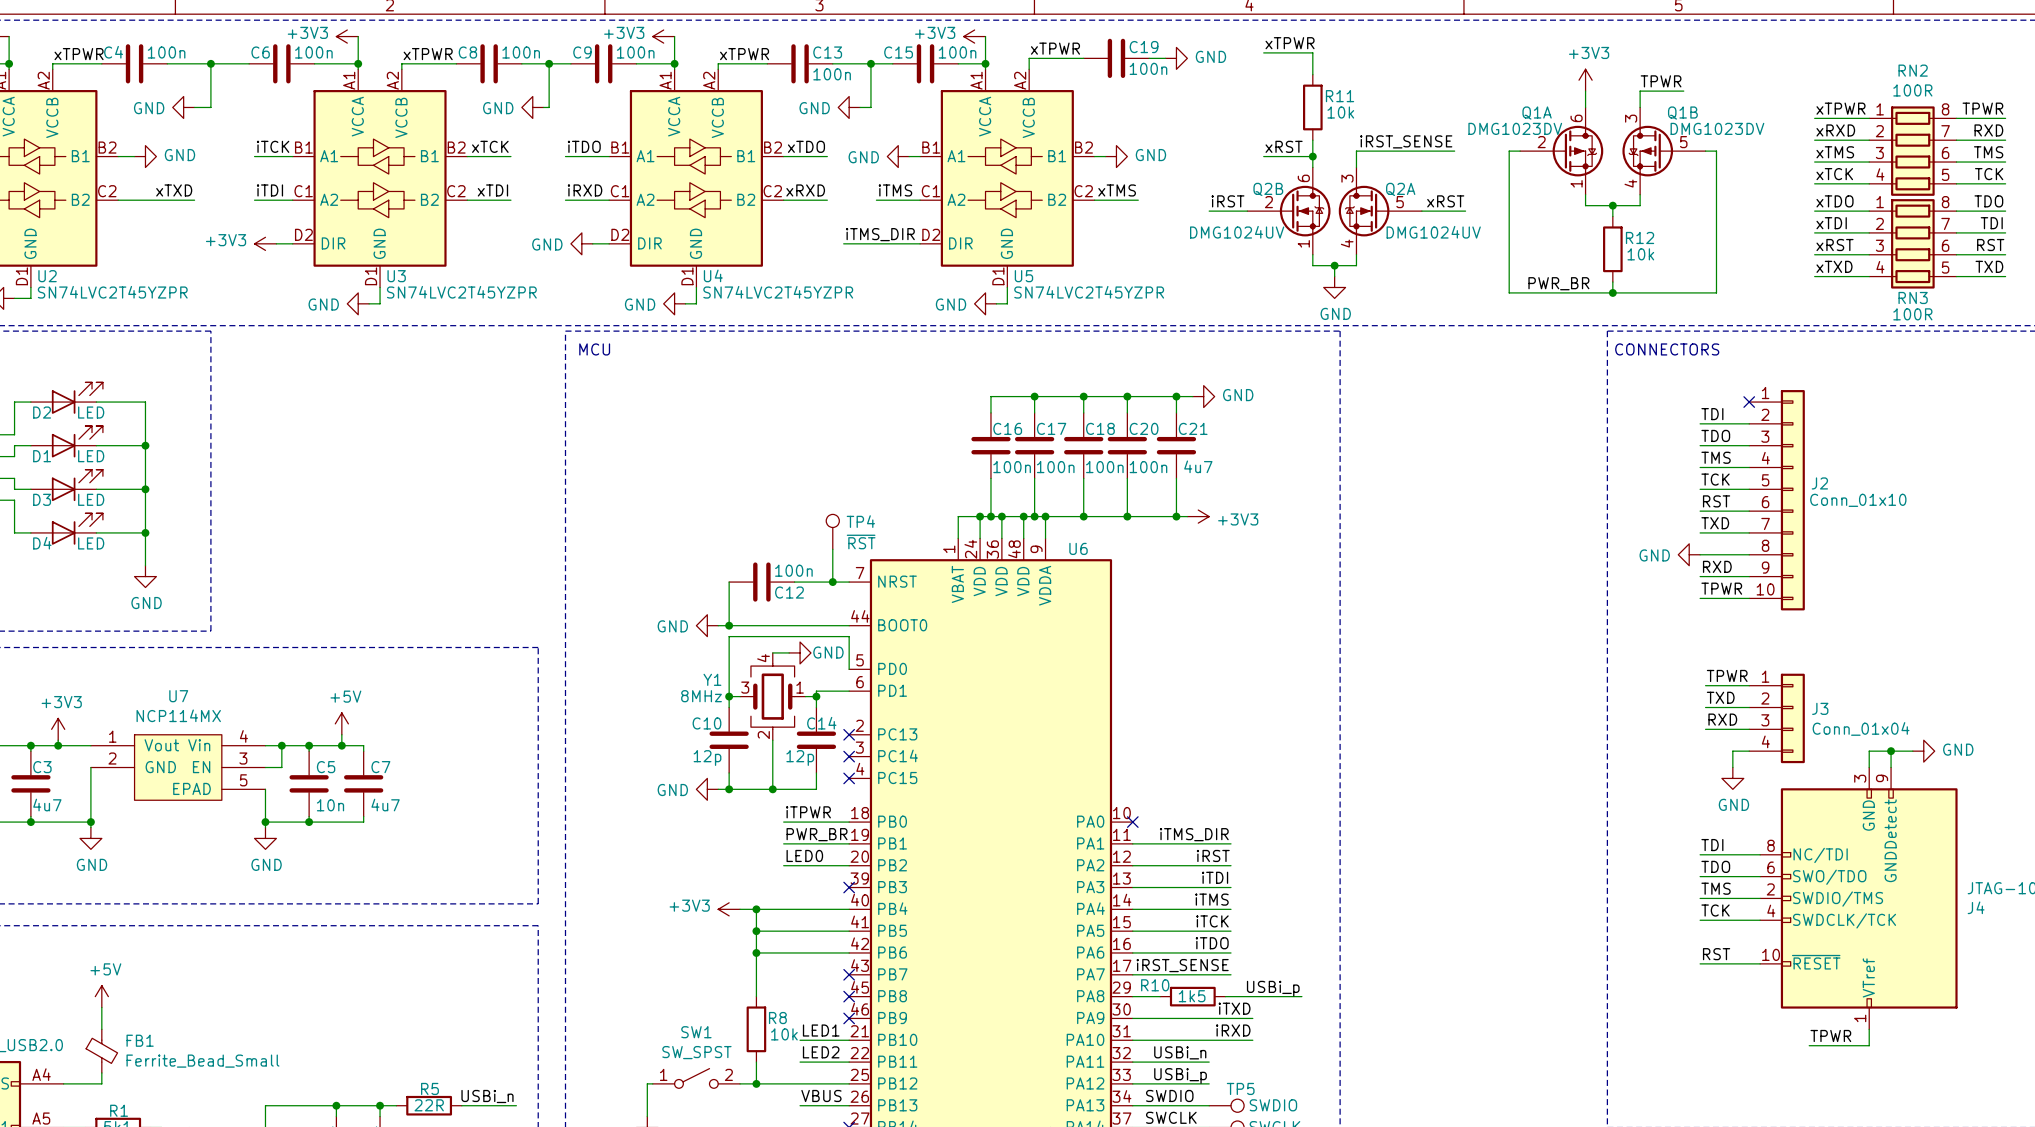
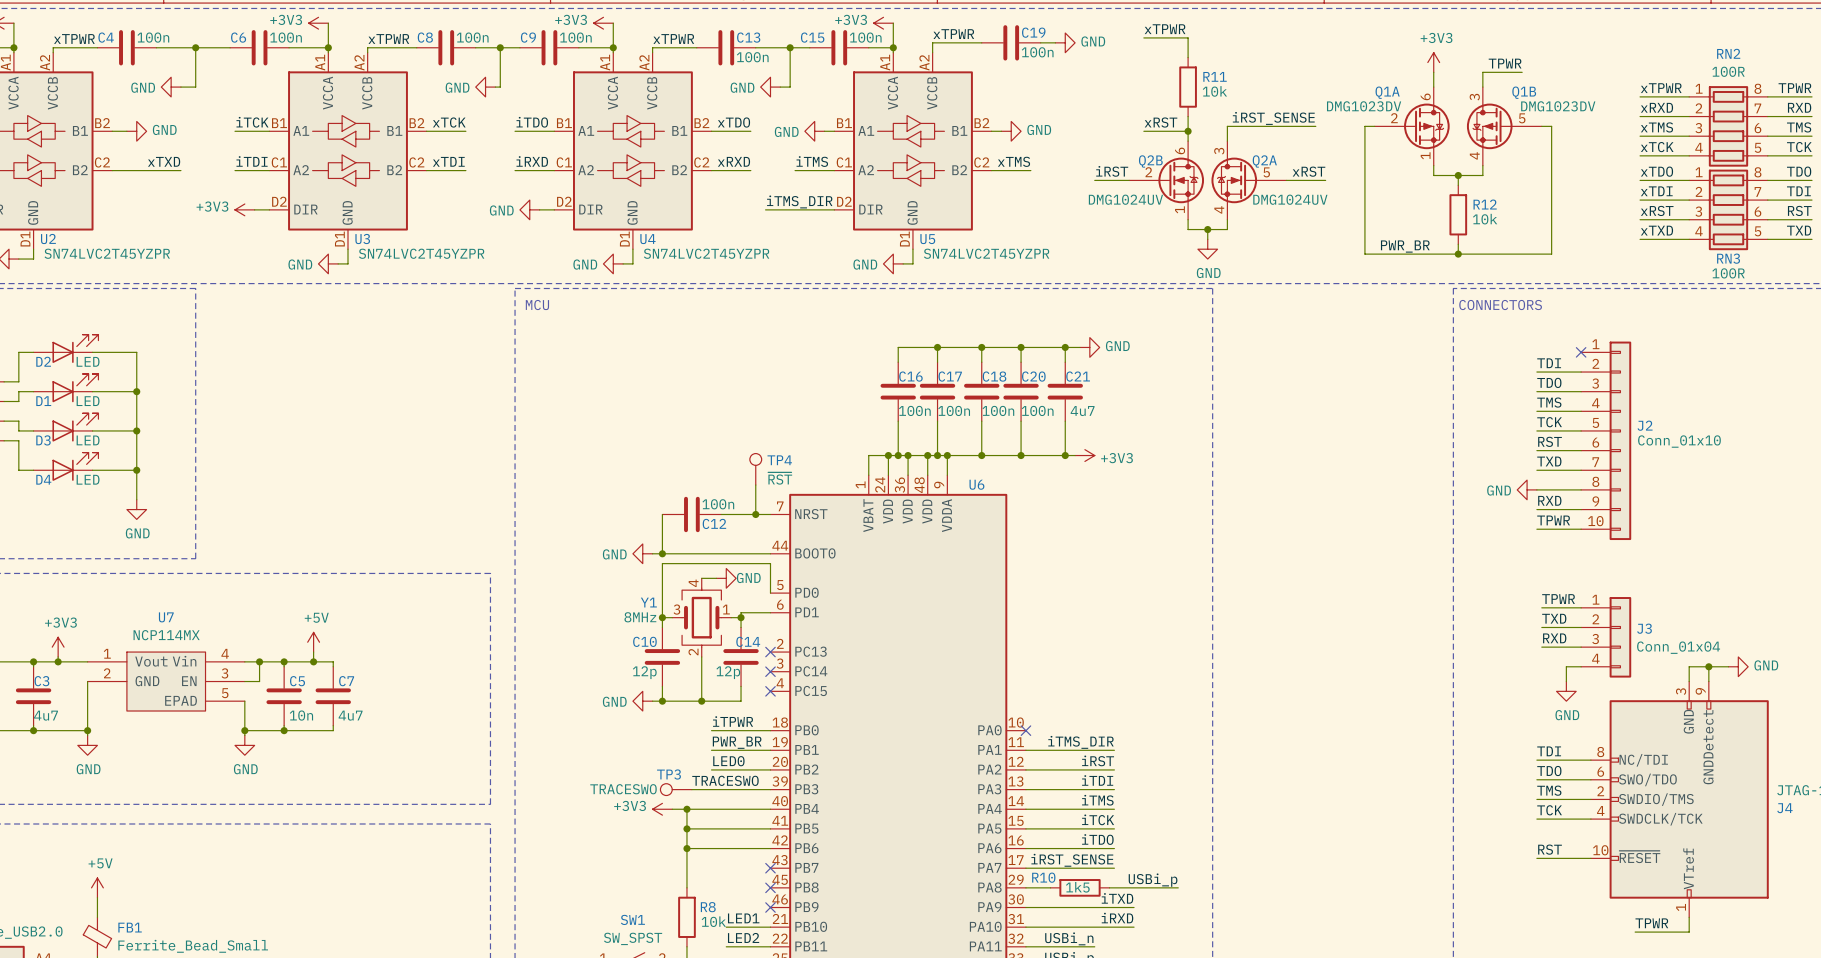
label: none -> TRACESWO (725, 780)
TP3: none -> TRACESWO (676, 789)
wire: none -> (691, 789) (770, 789)
no-connect mark: (849, 887) -> none

